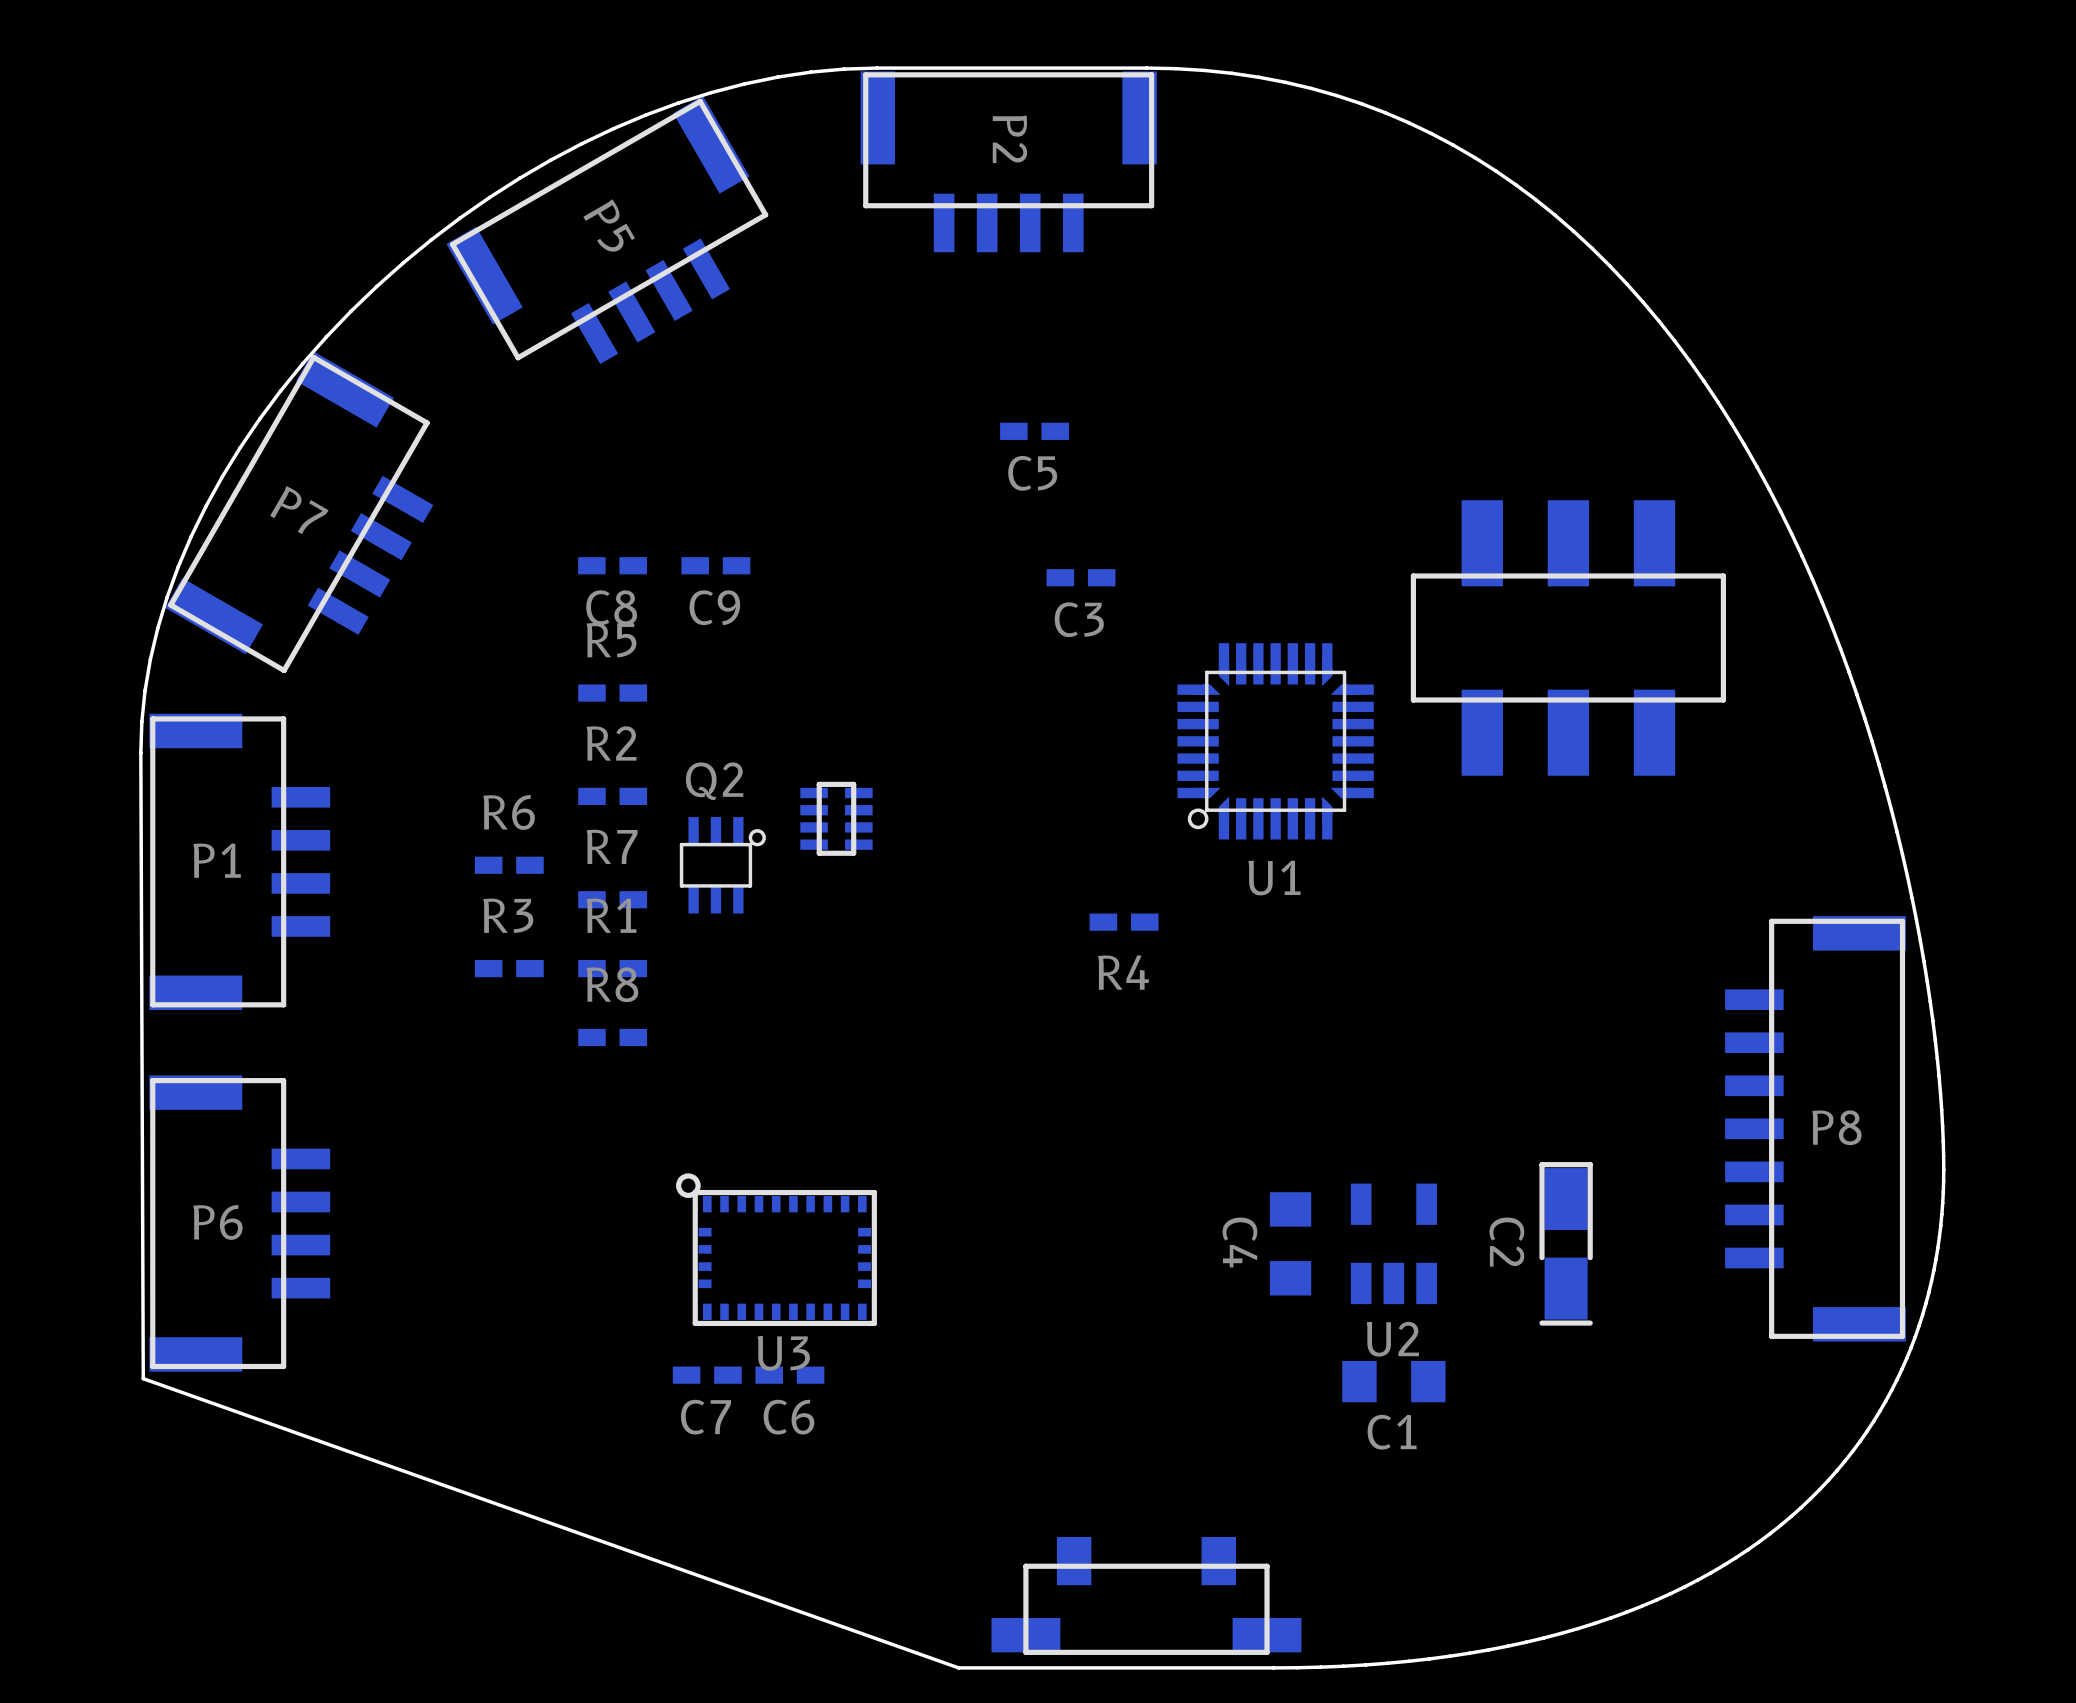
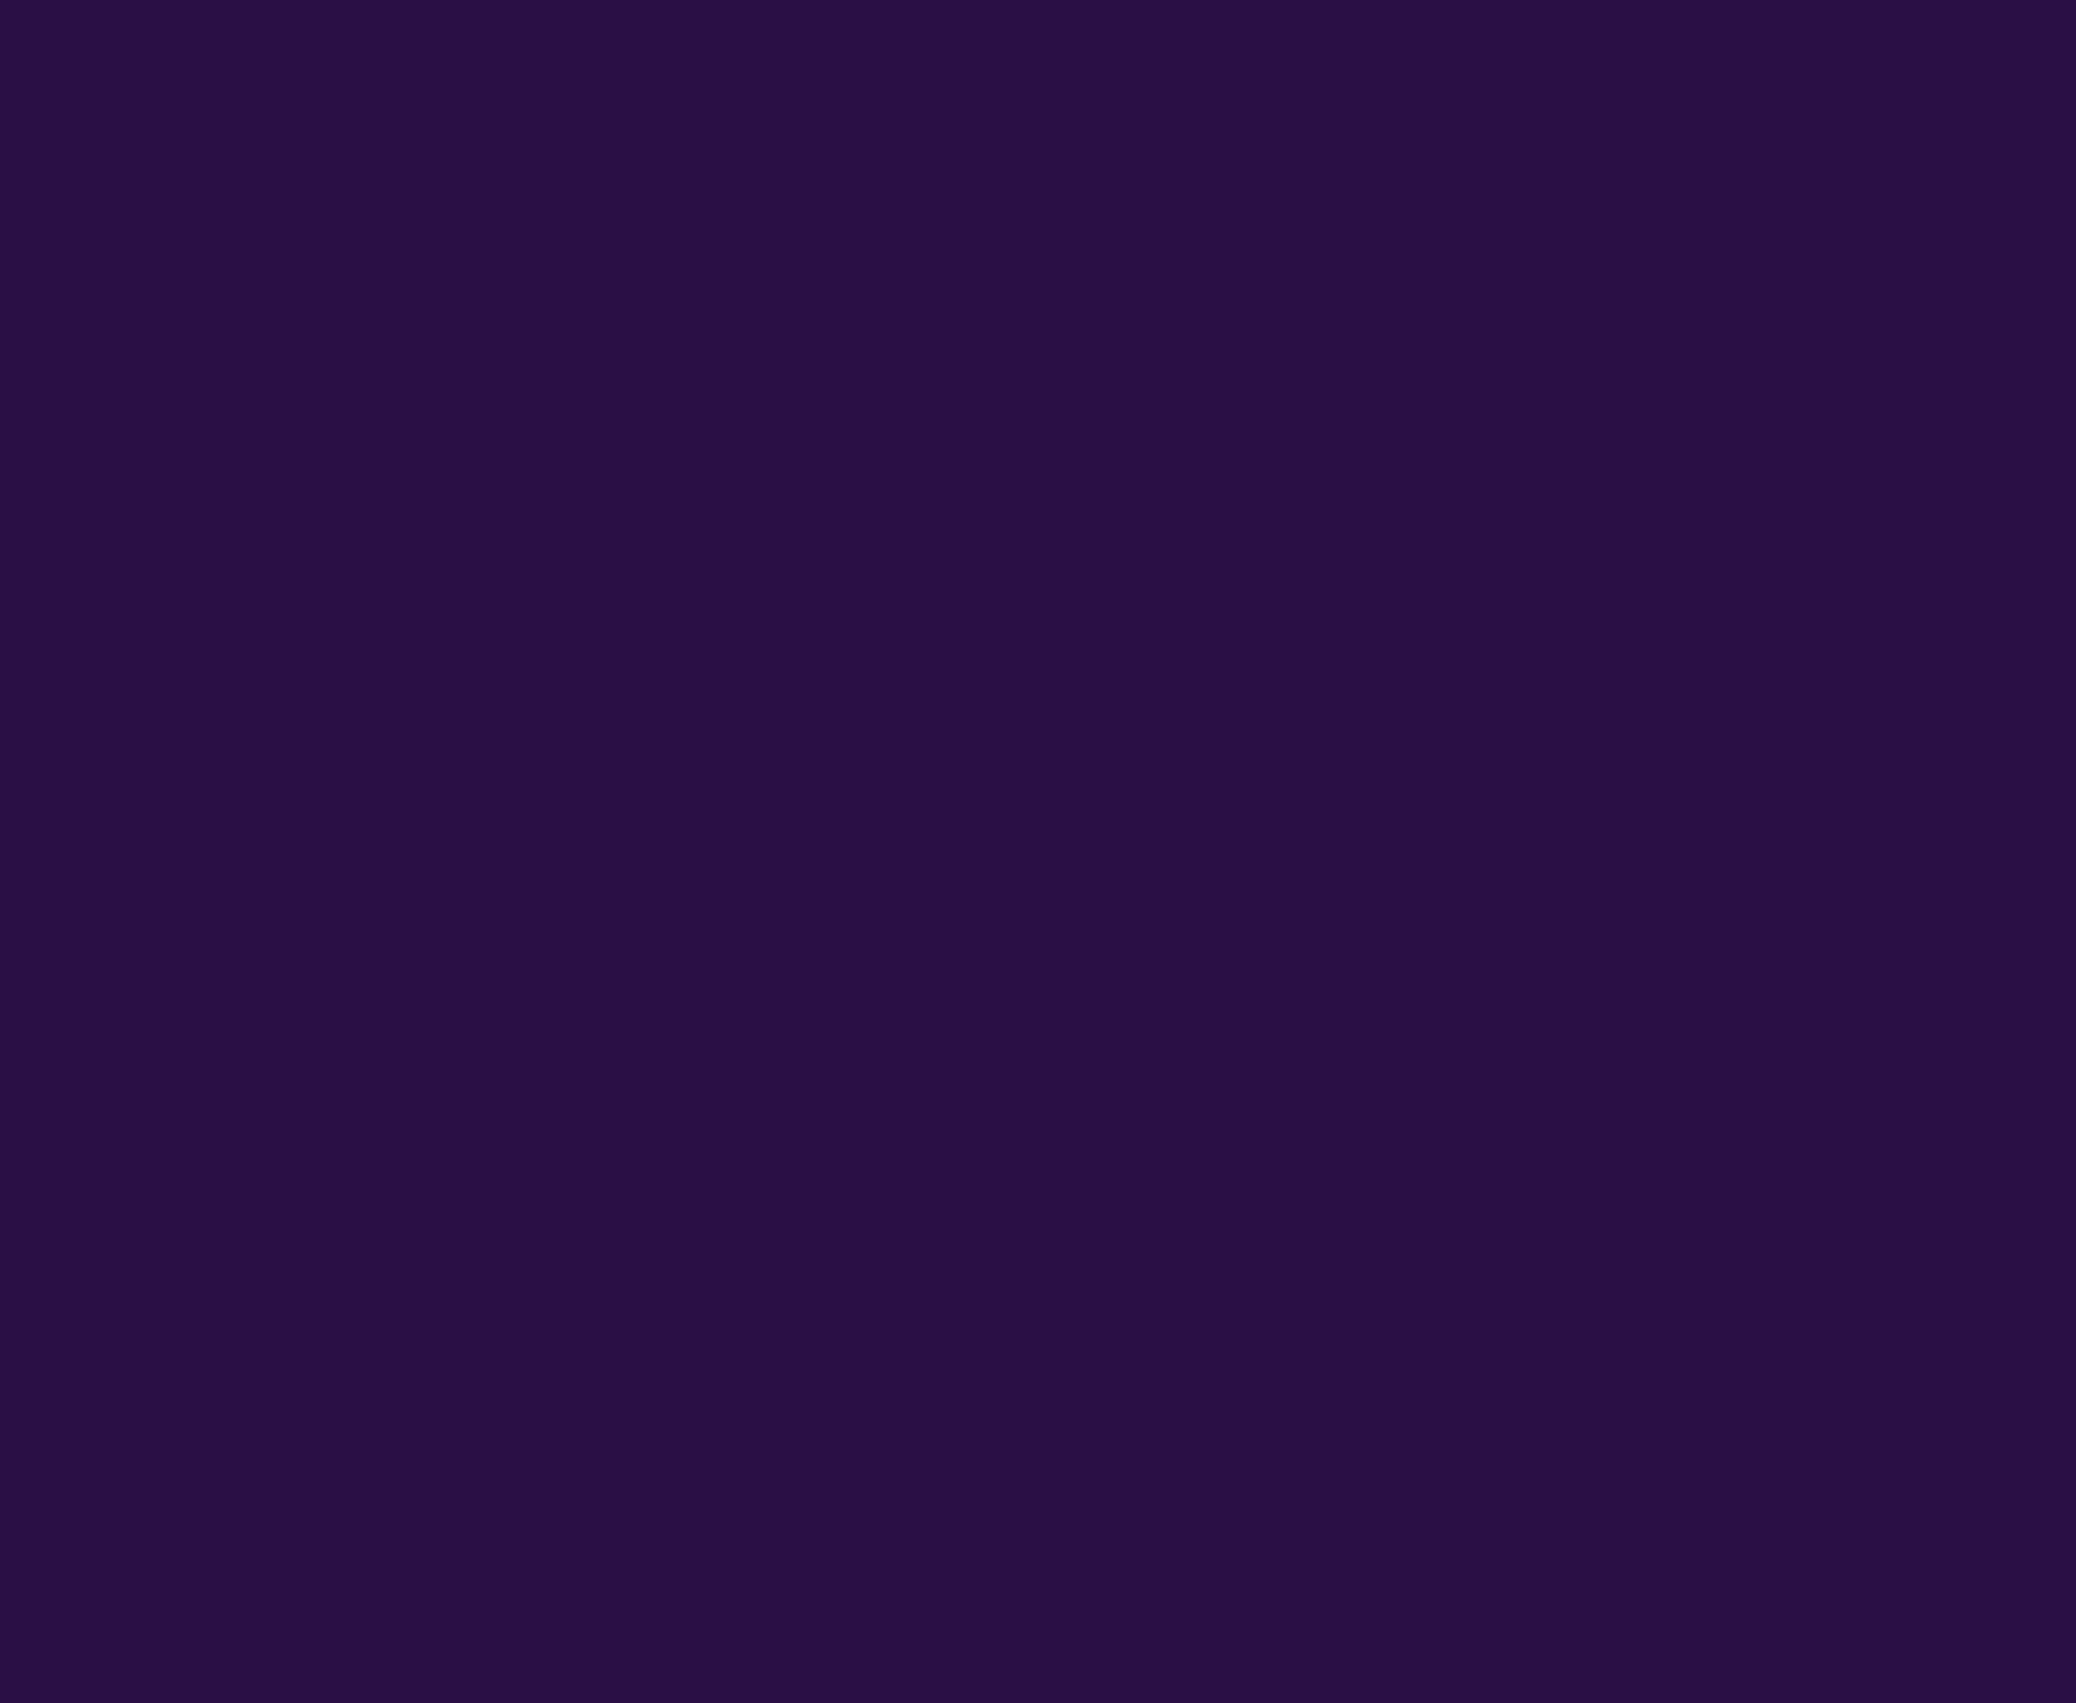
board edge: (1146, 68) (877, 68) (810, 72) (744, 83) (711, 92) (645, 114) (613, 128) (550, 160) (460, 218) (403, 262) (350, 311) (280, 390) (240, 447) (222, 476) (191, 536) (167, 597) (157, 628) (145, 690) (140, 752) (143, 1378) (958, 1667) (1343, 1666) (1449, 1656) (1543, 1637) (1594, 1623) (1641, 1606) (1684, 1586) (1723, 1565) (1759, 1541) (1791, 1516) (1819, 1489) (1852, 1451) (1873, 1421) (1897, 1379) (1915, 1336) (1928, 1292) (1937, 1247) (1942, 1203) (1943, 1155) (1940, 1093) (1932, 1020) (1920, 940) (1902, 854) (1885, 786) (1864, 718) (1840, 648) (1812, 579) (1780, 511) (1744, 444) (1718, 402) (1659, 321) (1626, 283) (1592, 248) (1555, 215) (1516, 185) (1474, 157) (1431, 133) (1385, 112) (1336, 95) (1285, 82) (1231, 73) (1146, 68) -> none
P2: (1008, 161) -> none
P5: (607, 229) -> none
C5: (1034, 431) -> none
P7: (299, 512) -> none
C8: (612, 565) -> none
C9: (715, 565) -> none
C3: (1081, 577) -> none
part: (1568, 638) -> none
R5: (612, 693) -> none
U1: (1275, 741) -> none
R2: (612, 796) -> none
part: (836, 818) -> none
P1: (239, 861) -> none
R6: (509, 865) -> none
Q2: (722, 865) -> none
R7: (612, 899) -> none
R4: (1124, 922) -> none
R3: (509, 968) -> none
R1: (612, 968) -> none
R8: (612, 1037) -> none
P8: (1815, 1128) -> none
P6: (239, 1223) -> none
C4: (1290, 1243) -> none
U2: (1393, 1243) -> none
C2: (1566, 1243) -> none
U3: (776, 1249) -> none
C7: (707, 1375) -> none
C6: (789, 1375) -> none
C1: (1393, 1381) -> none
part: (1146, 1595) -> none

